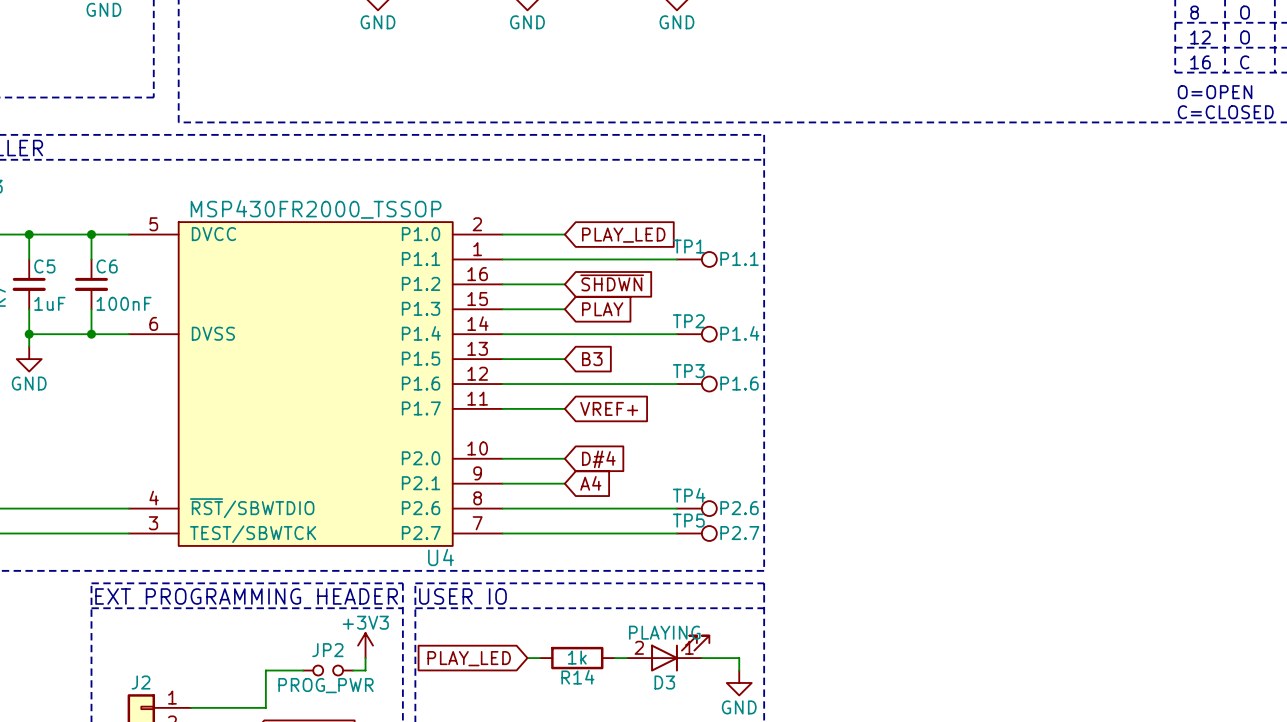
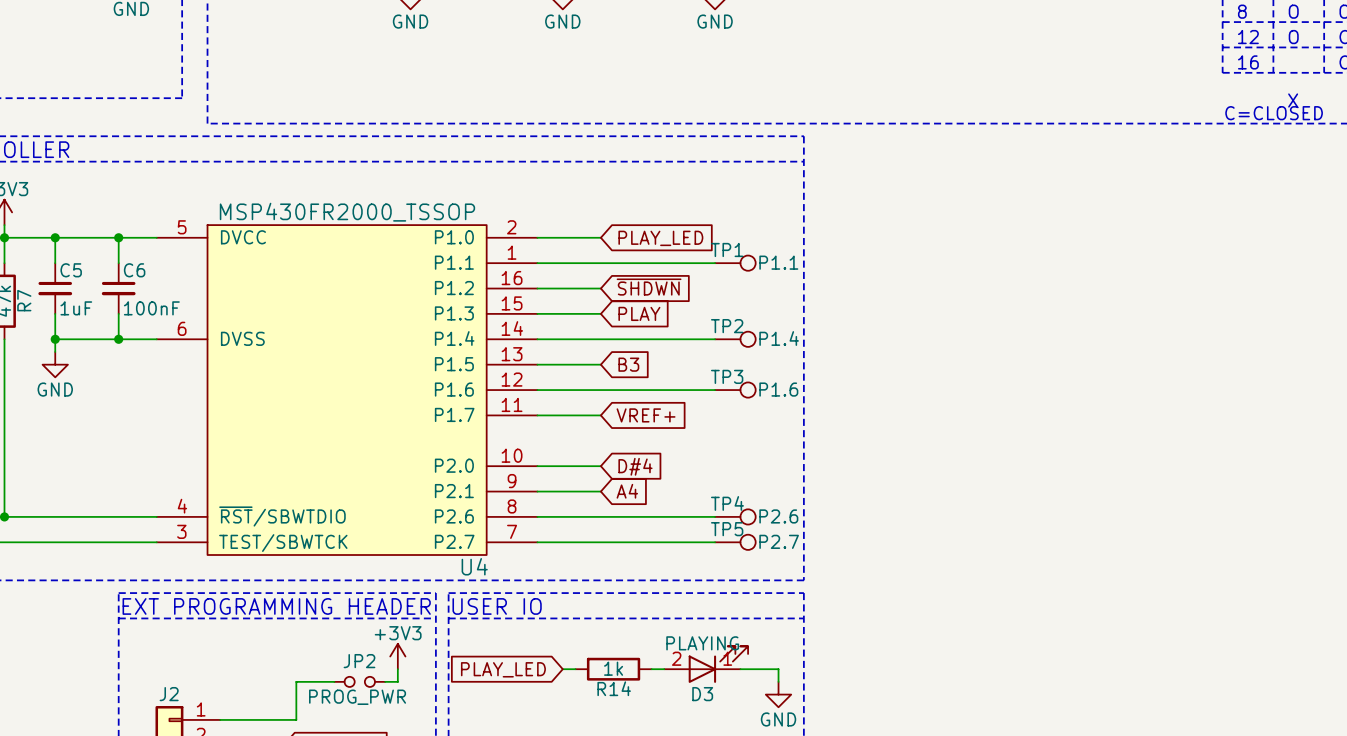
text: C (1244, 62) -> none
text: O=OPEN (1215, 92) -> none
text: none -> X (1293, 100)

